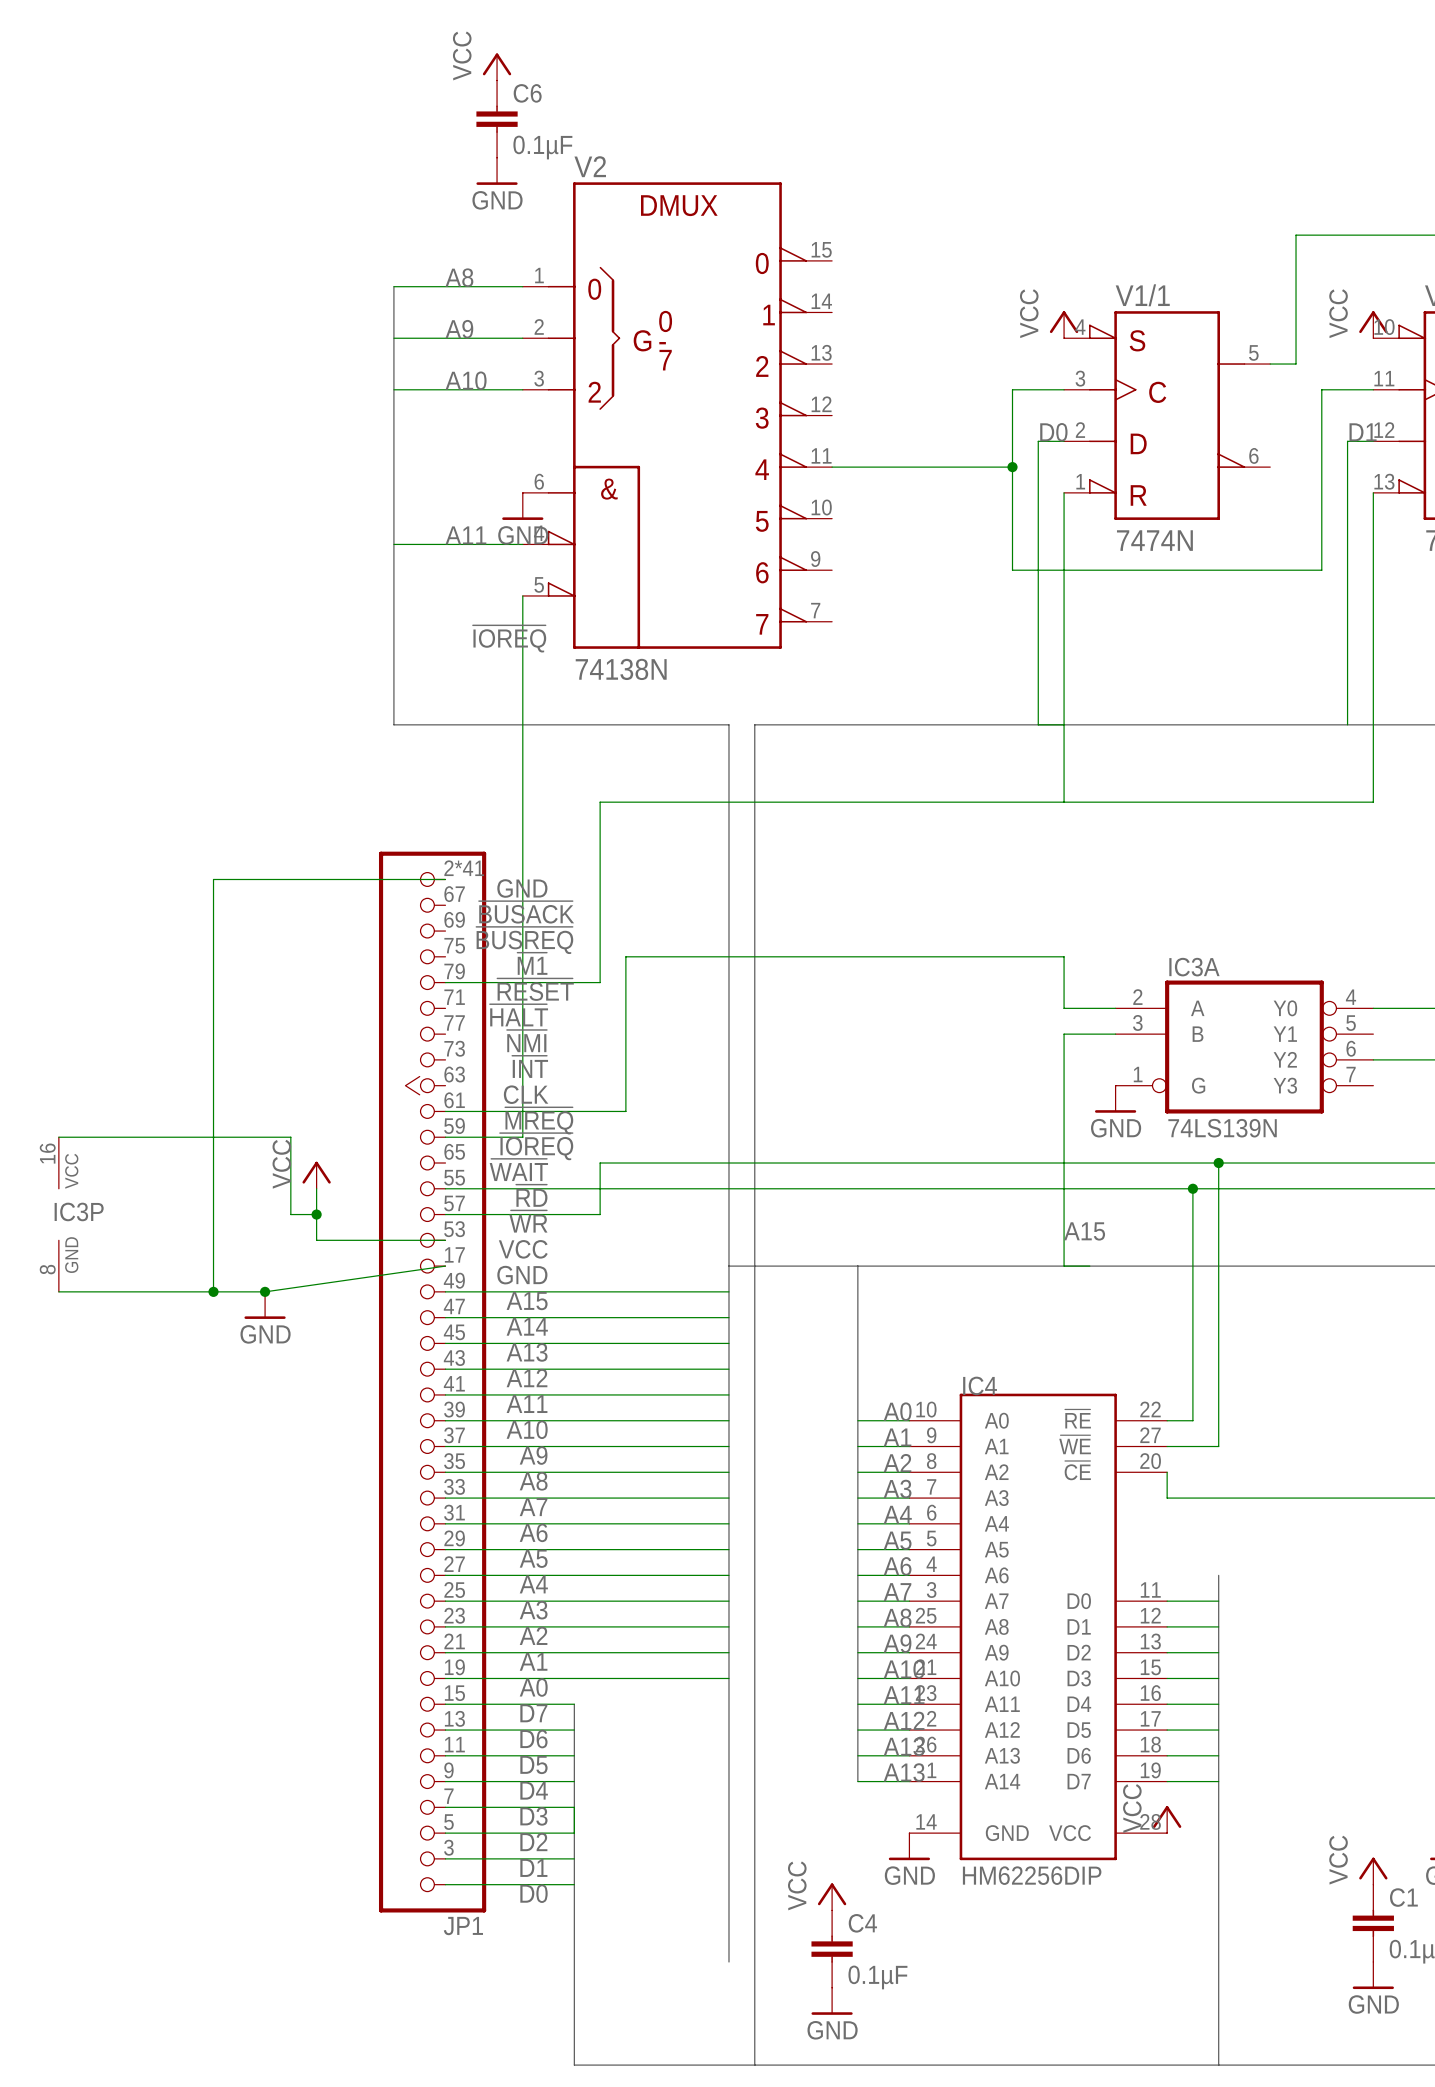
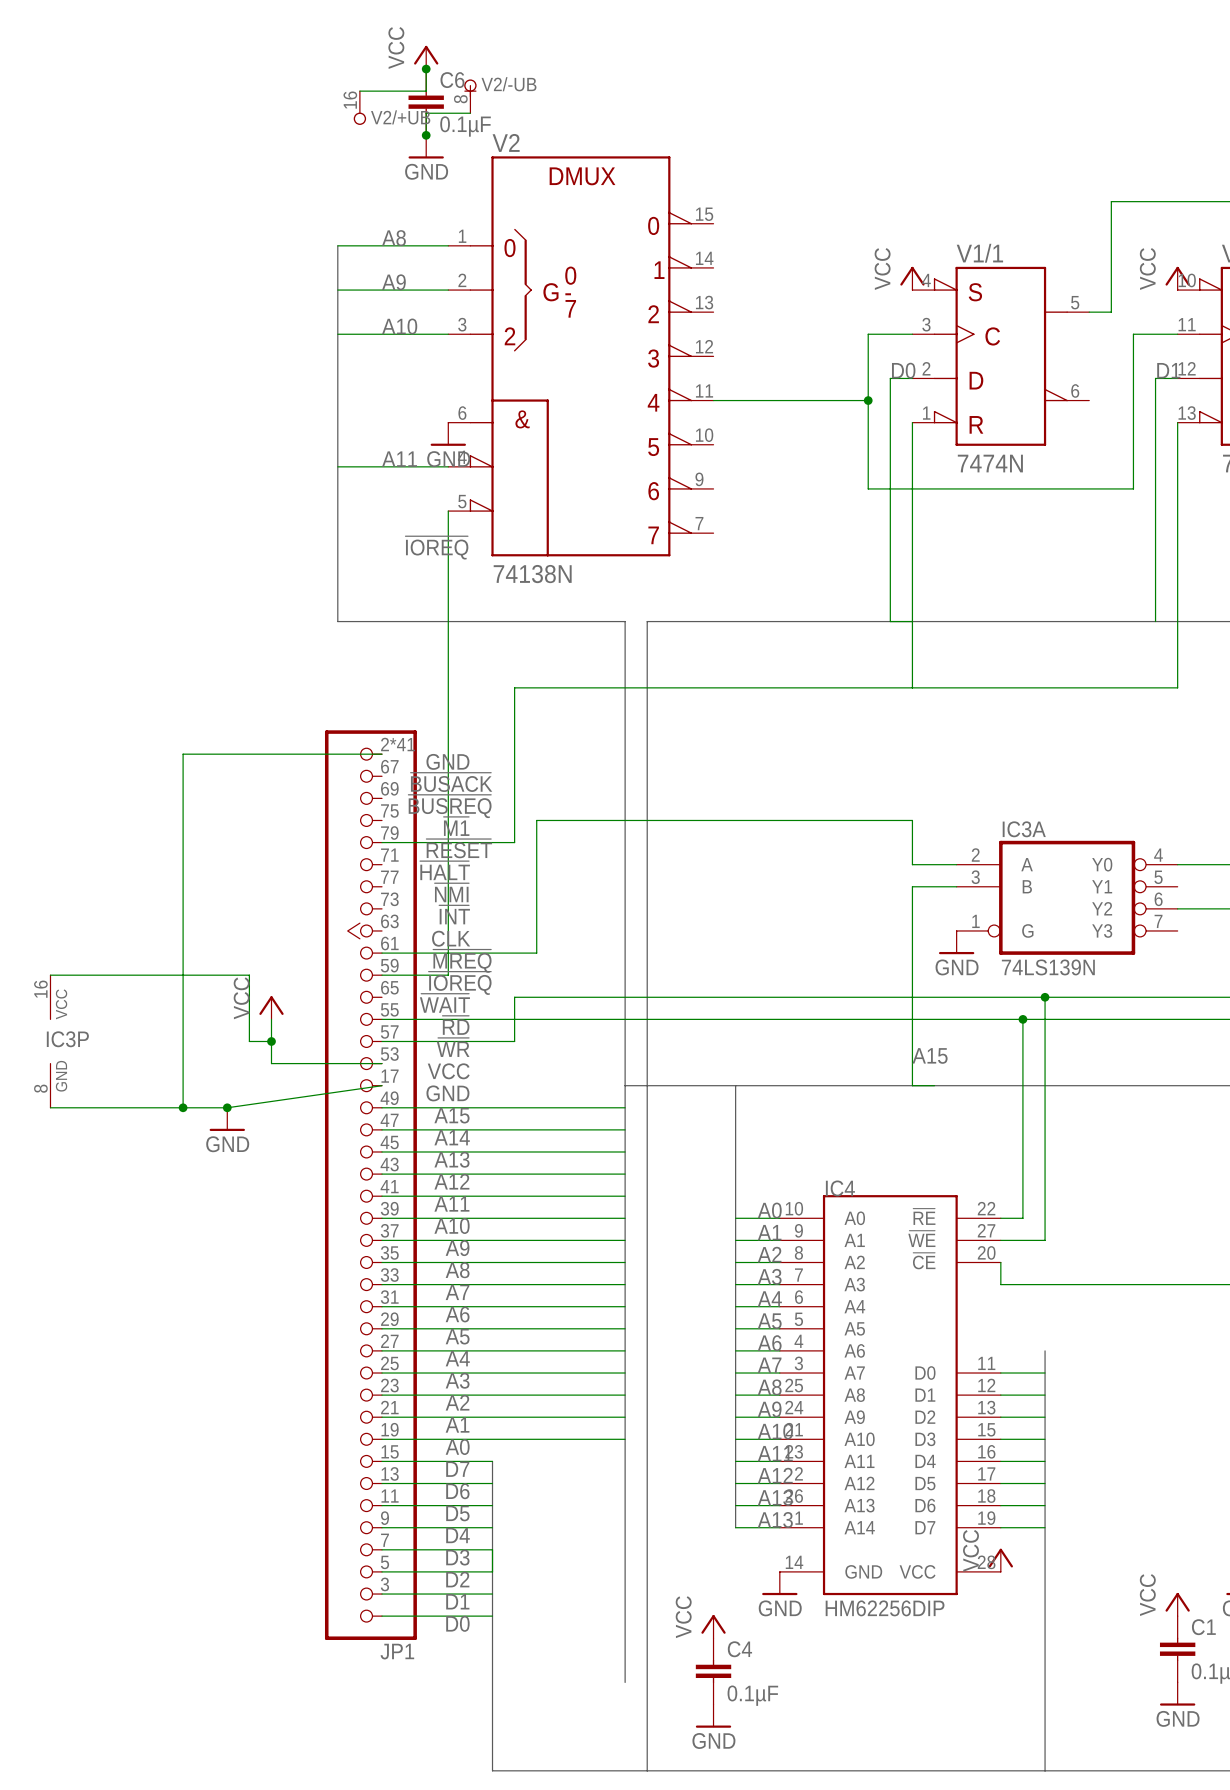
wire: none -> (426, 69) (426, 91) (359, 91)
junction: none -> (426, 69)
V2/-UB: none -> (470, 96)
V2/+UB: none -> (359, 108)
wire: none -> (470, 113) (426, 113) (426, 135)
junction: none -> (426, 135)

